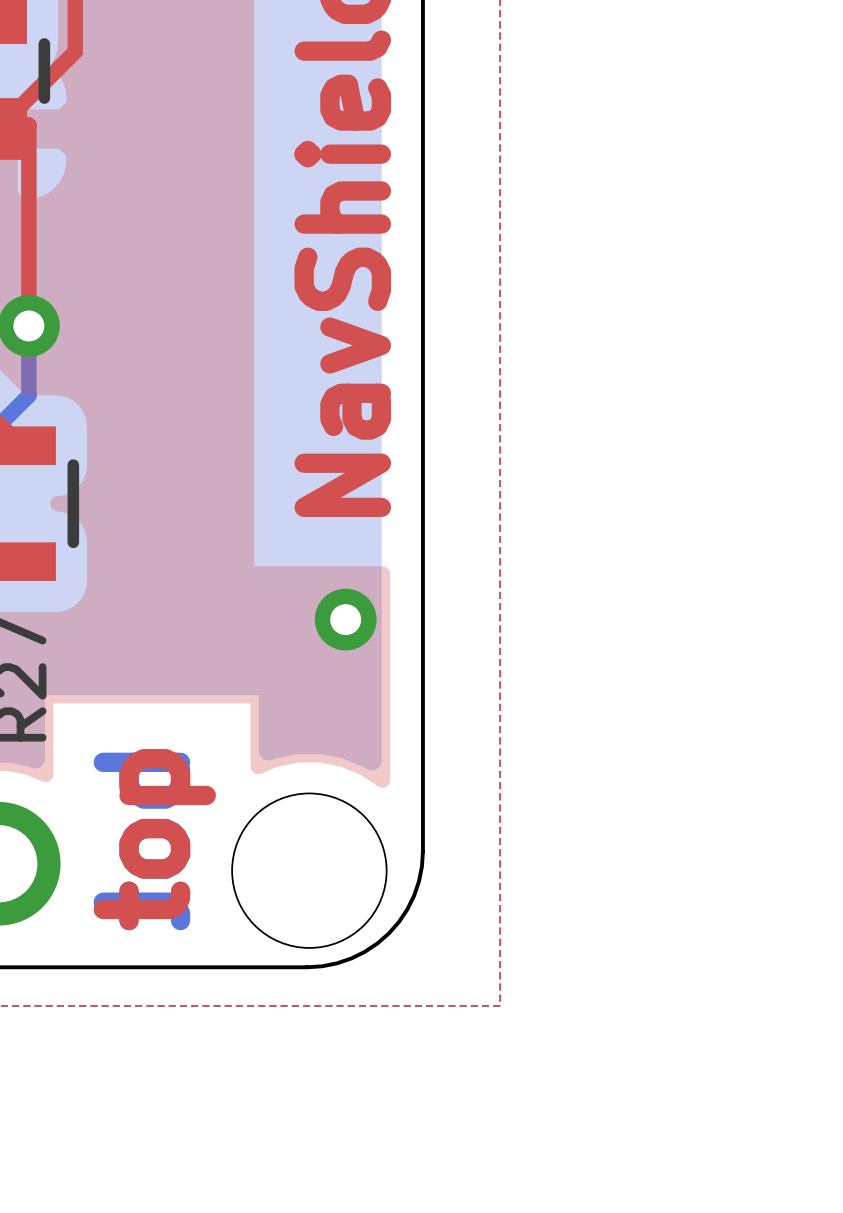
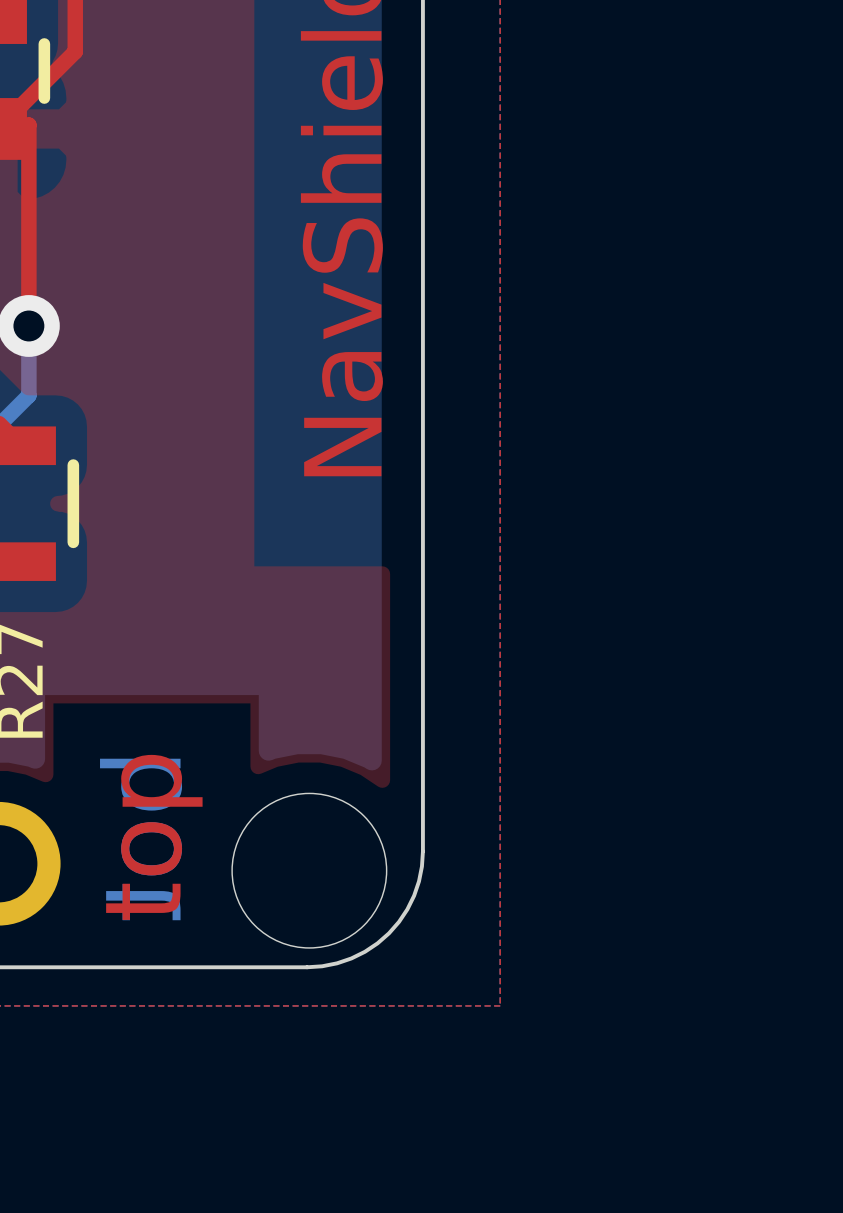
via: (345, 619) -> none

